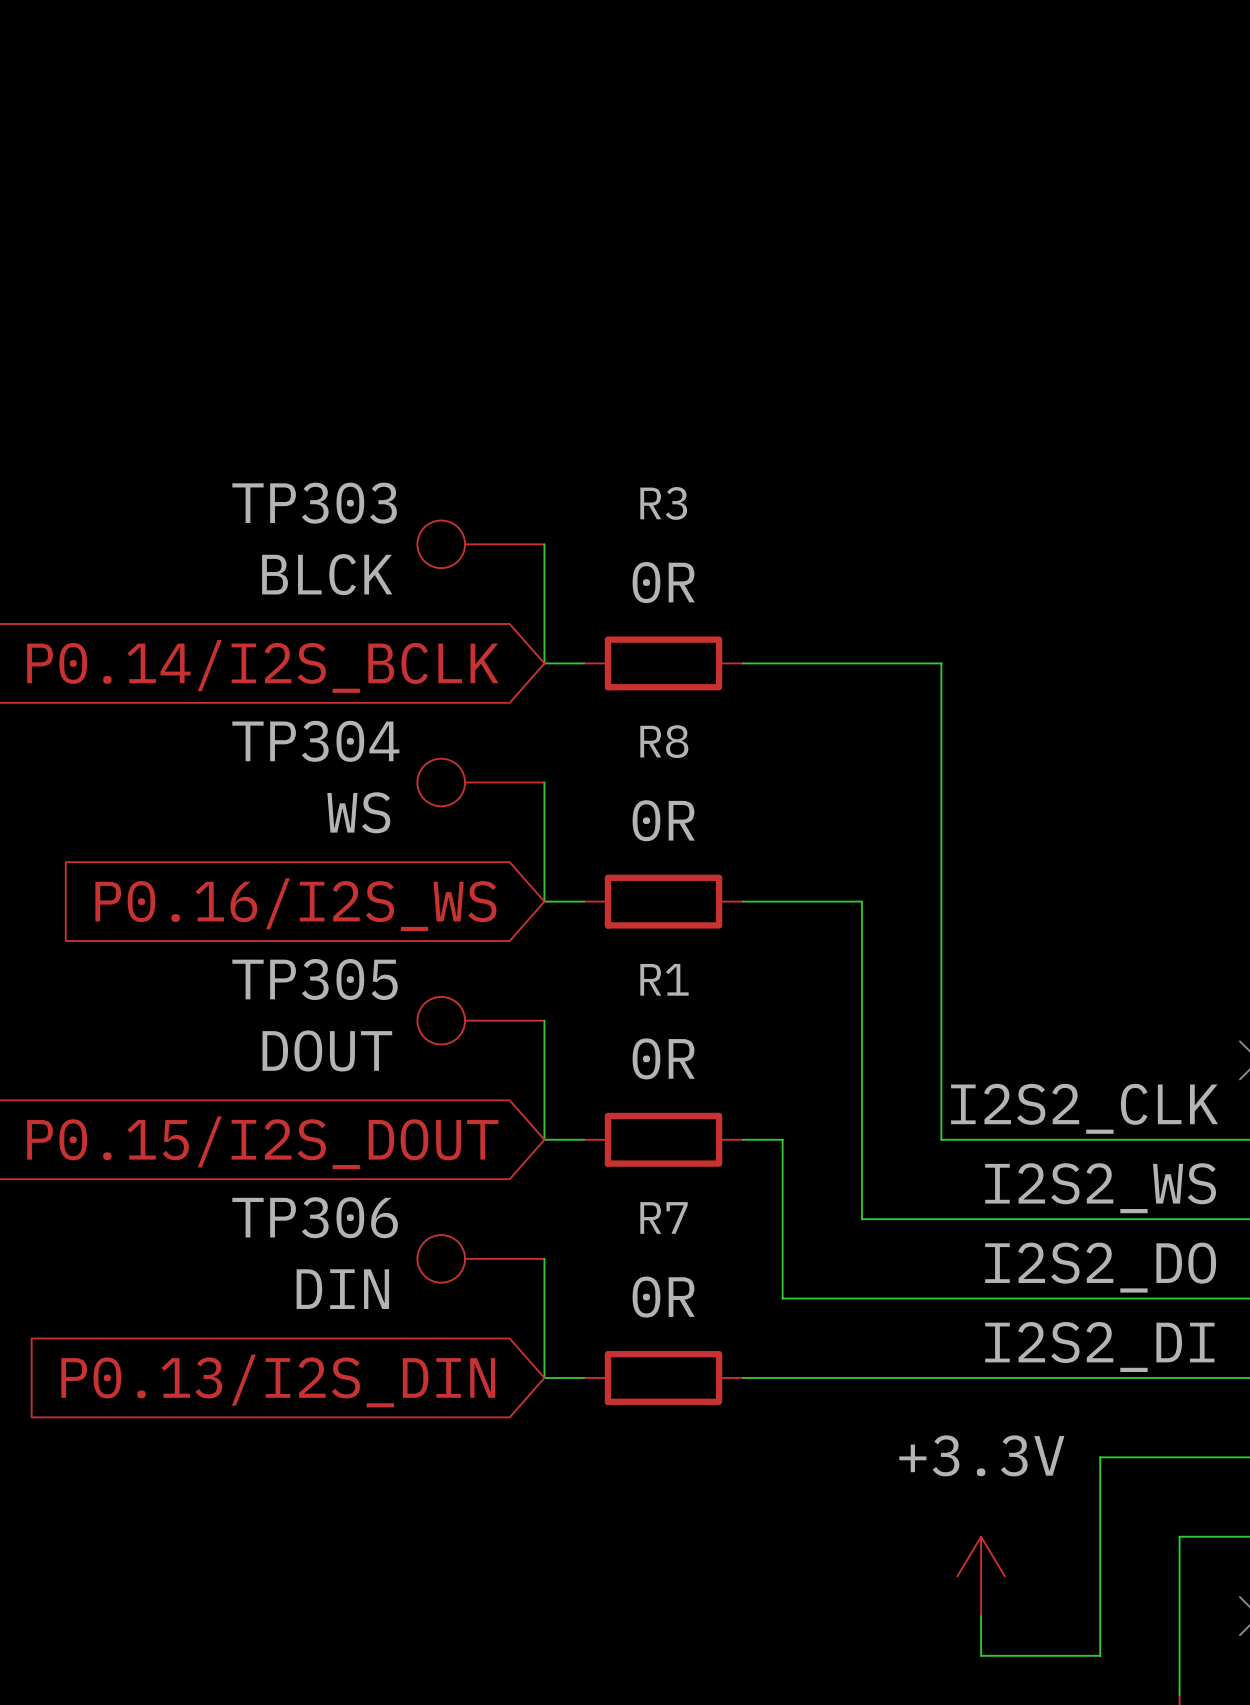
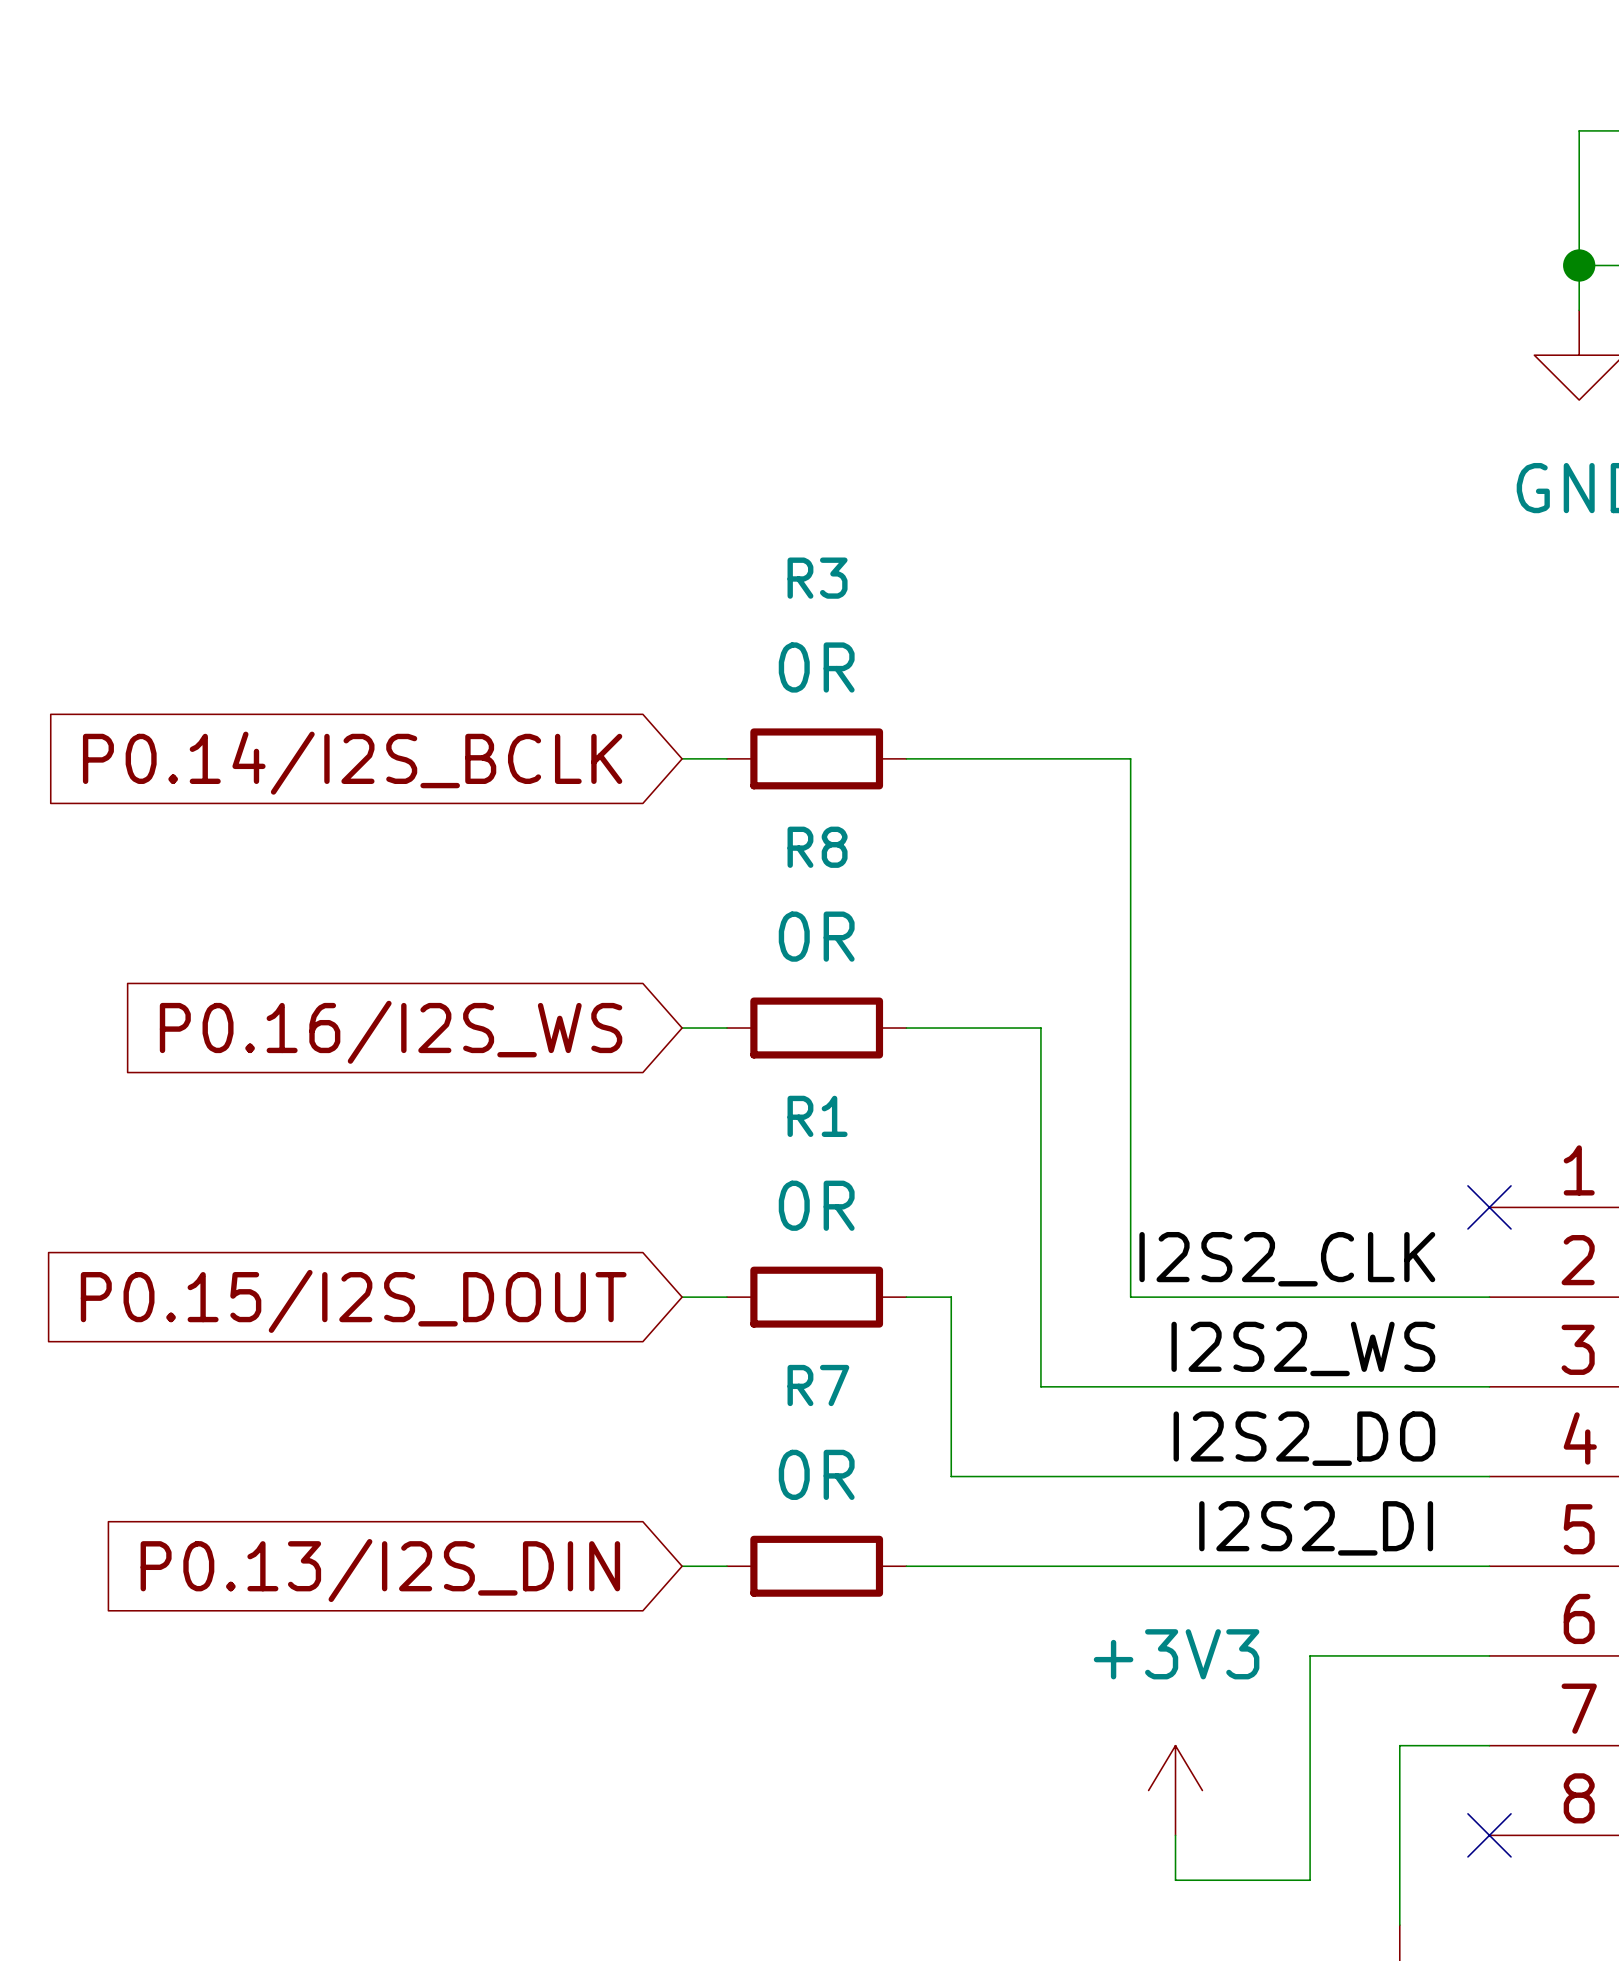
TP303: BLCK (480, 544) -> none
wire: (544, 544) (544, 663) -> none
TP304: WS (480, 782) -> none
wire: (544, 782) (544, 901) -> none
TP305: DOUT (480, 1020) -> none
wire: (544, 1020) (544, 1139) -> none
TP306: DIN (480, 1258) -> none
wire: (544, 1258) (544, 1377) -> none
power symbol: +3.3V (981, 1576) -> +3V3 (1175, 1790)

